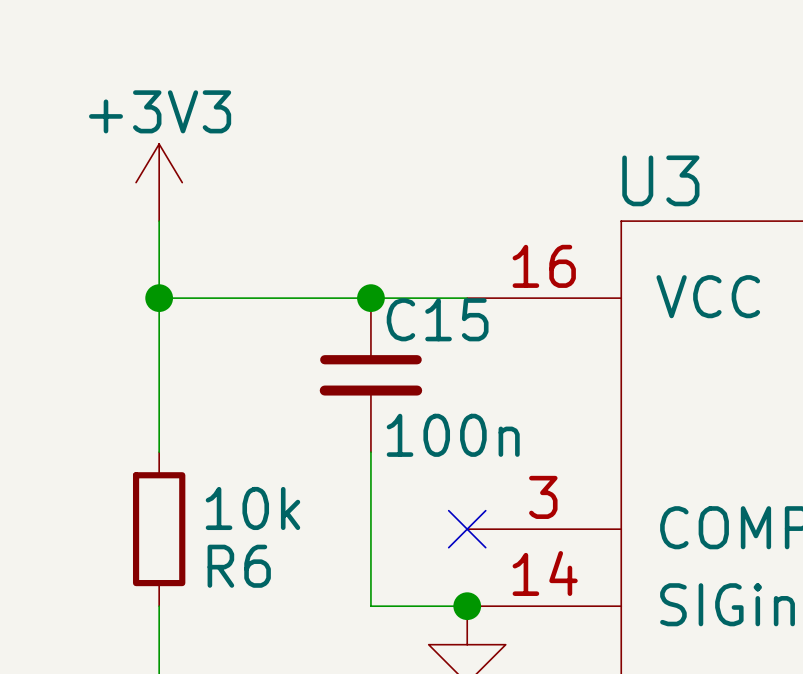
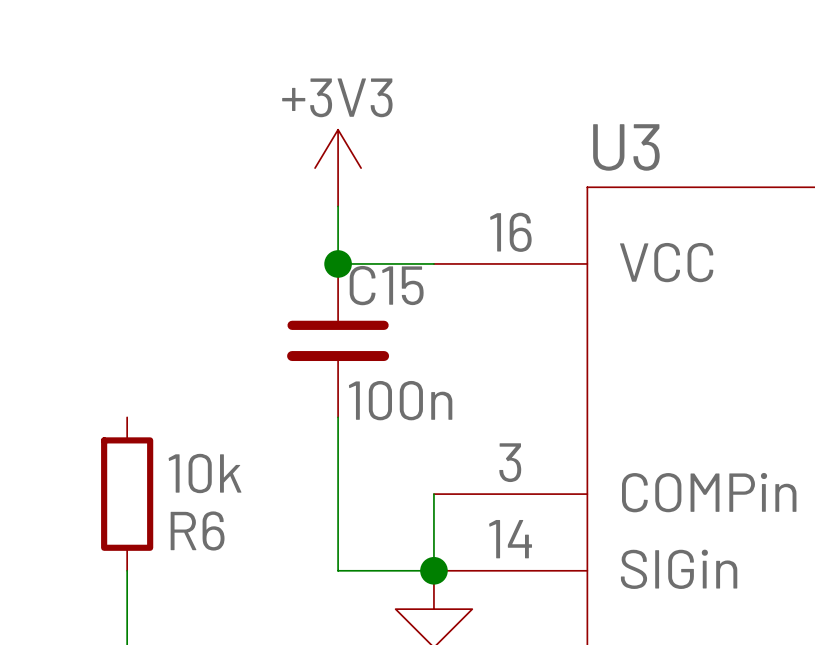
power symbol position: +3V3 (159, 182) -> +3V3 (338, 168)
wire: (159, 221) (159, 452) -> none
wire: (159, 298) (370, 298) -> (338, 206) (338, 263)
junction: (159, 298) -> none
wire: none -> (433, 494) (433, 570)
no-connect mark: (467, 529) -> none

